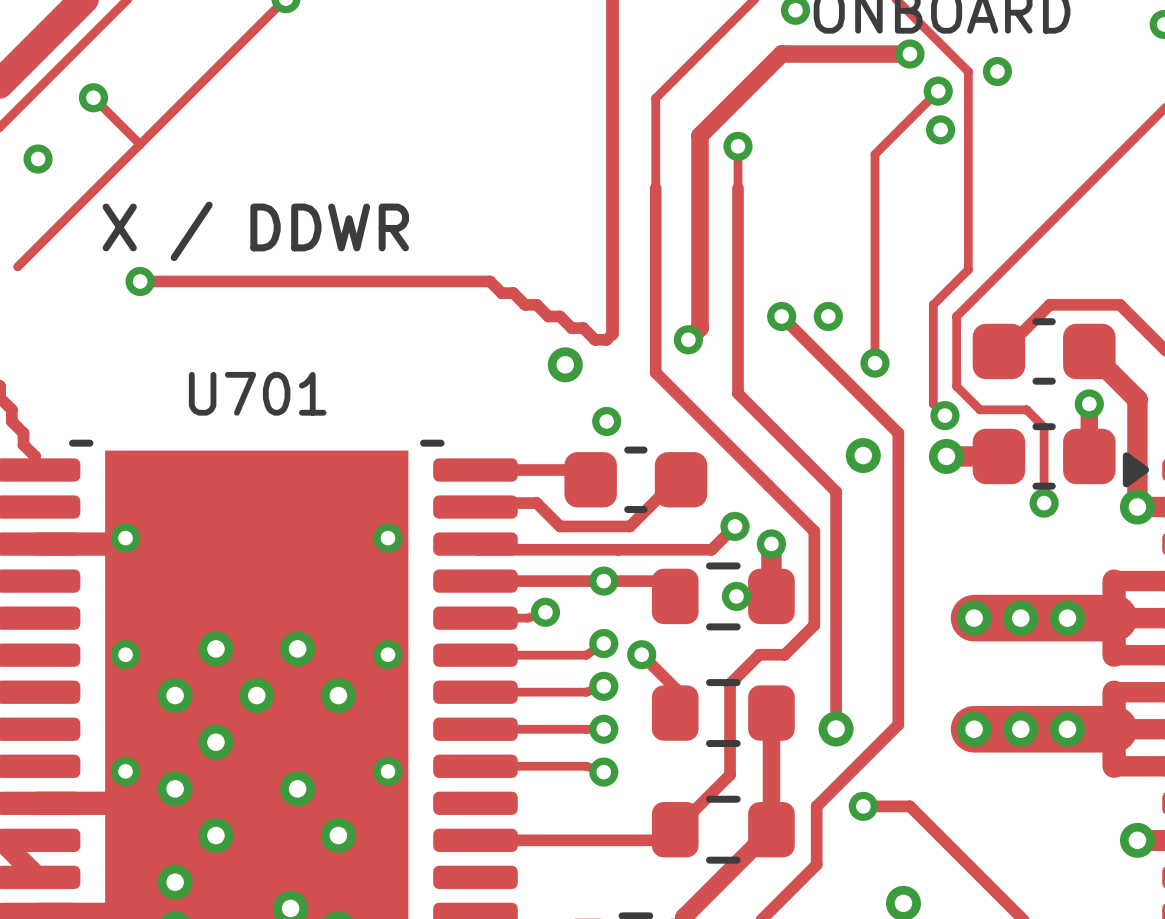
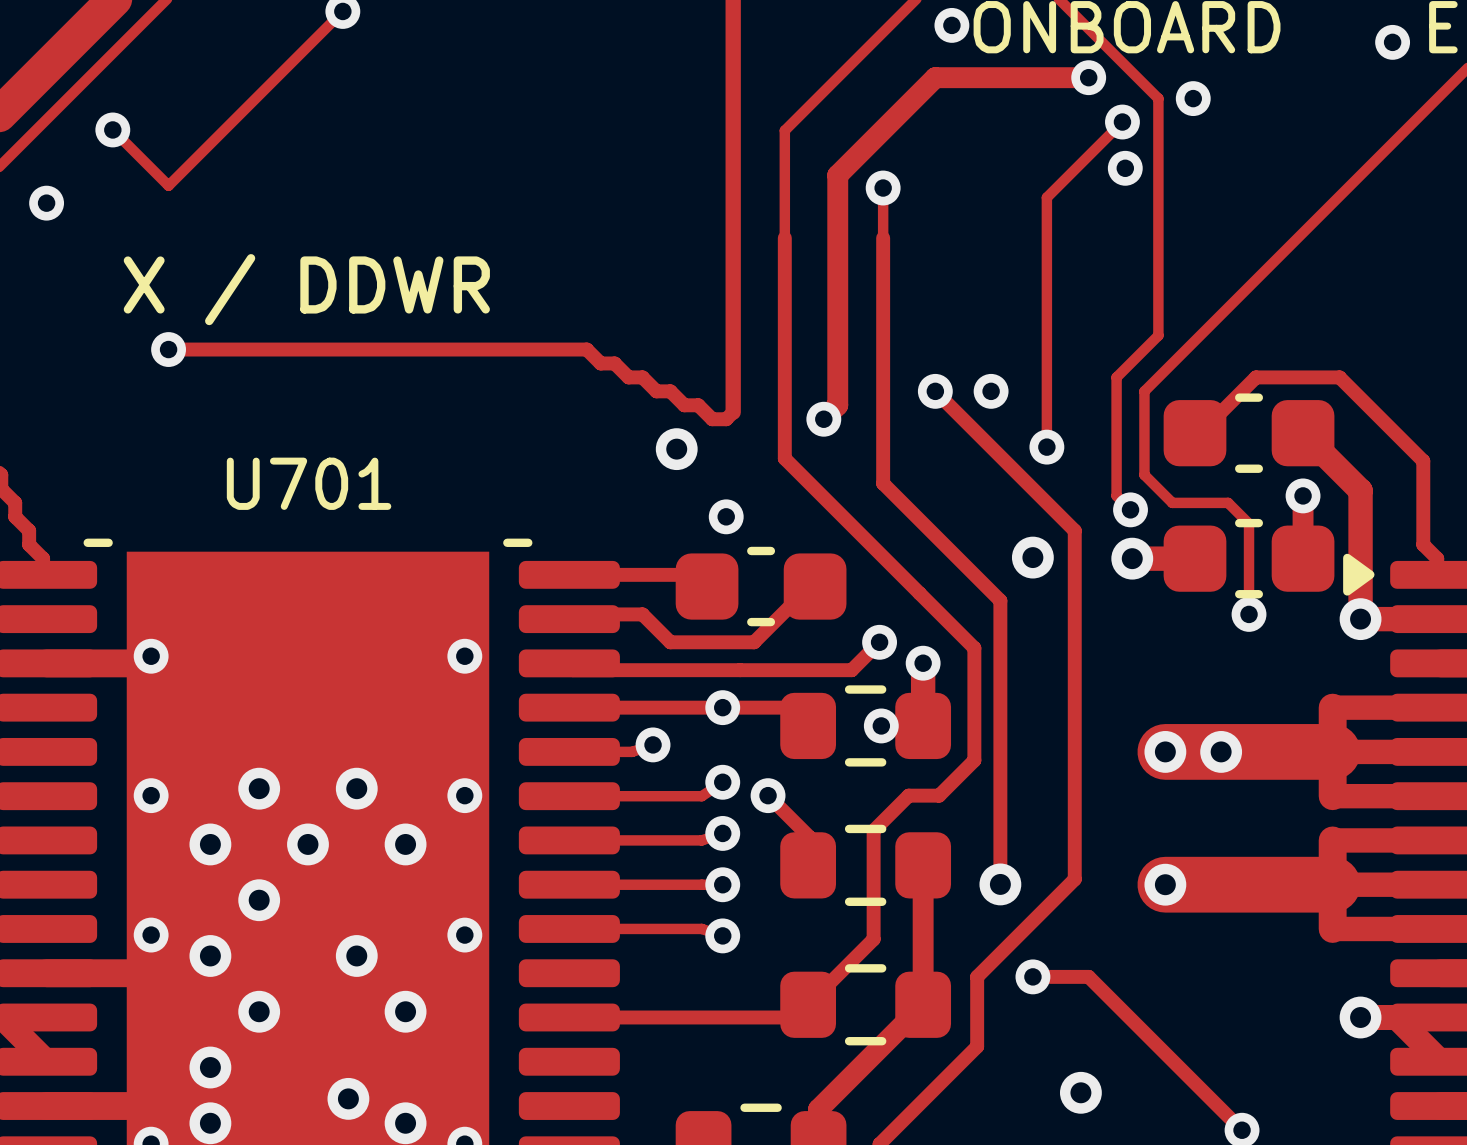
track: (140, 144) (17, 266) -> none
via: (1067, 618) -> none
via: (1020, 729) -> none
via: (1067, 729) -> none

